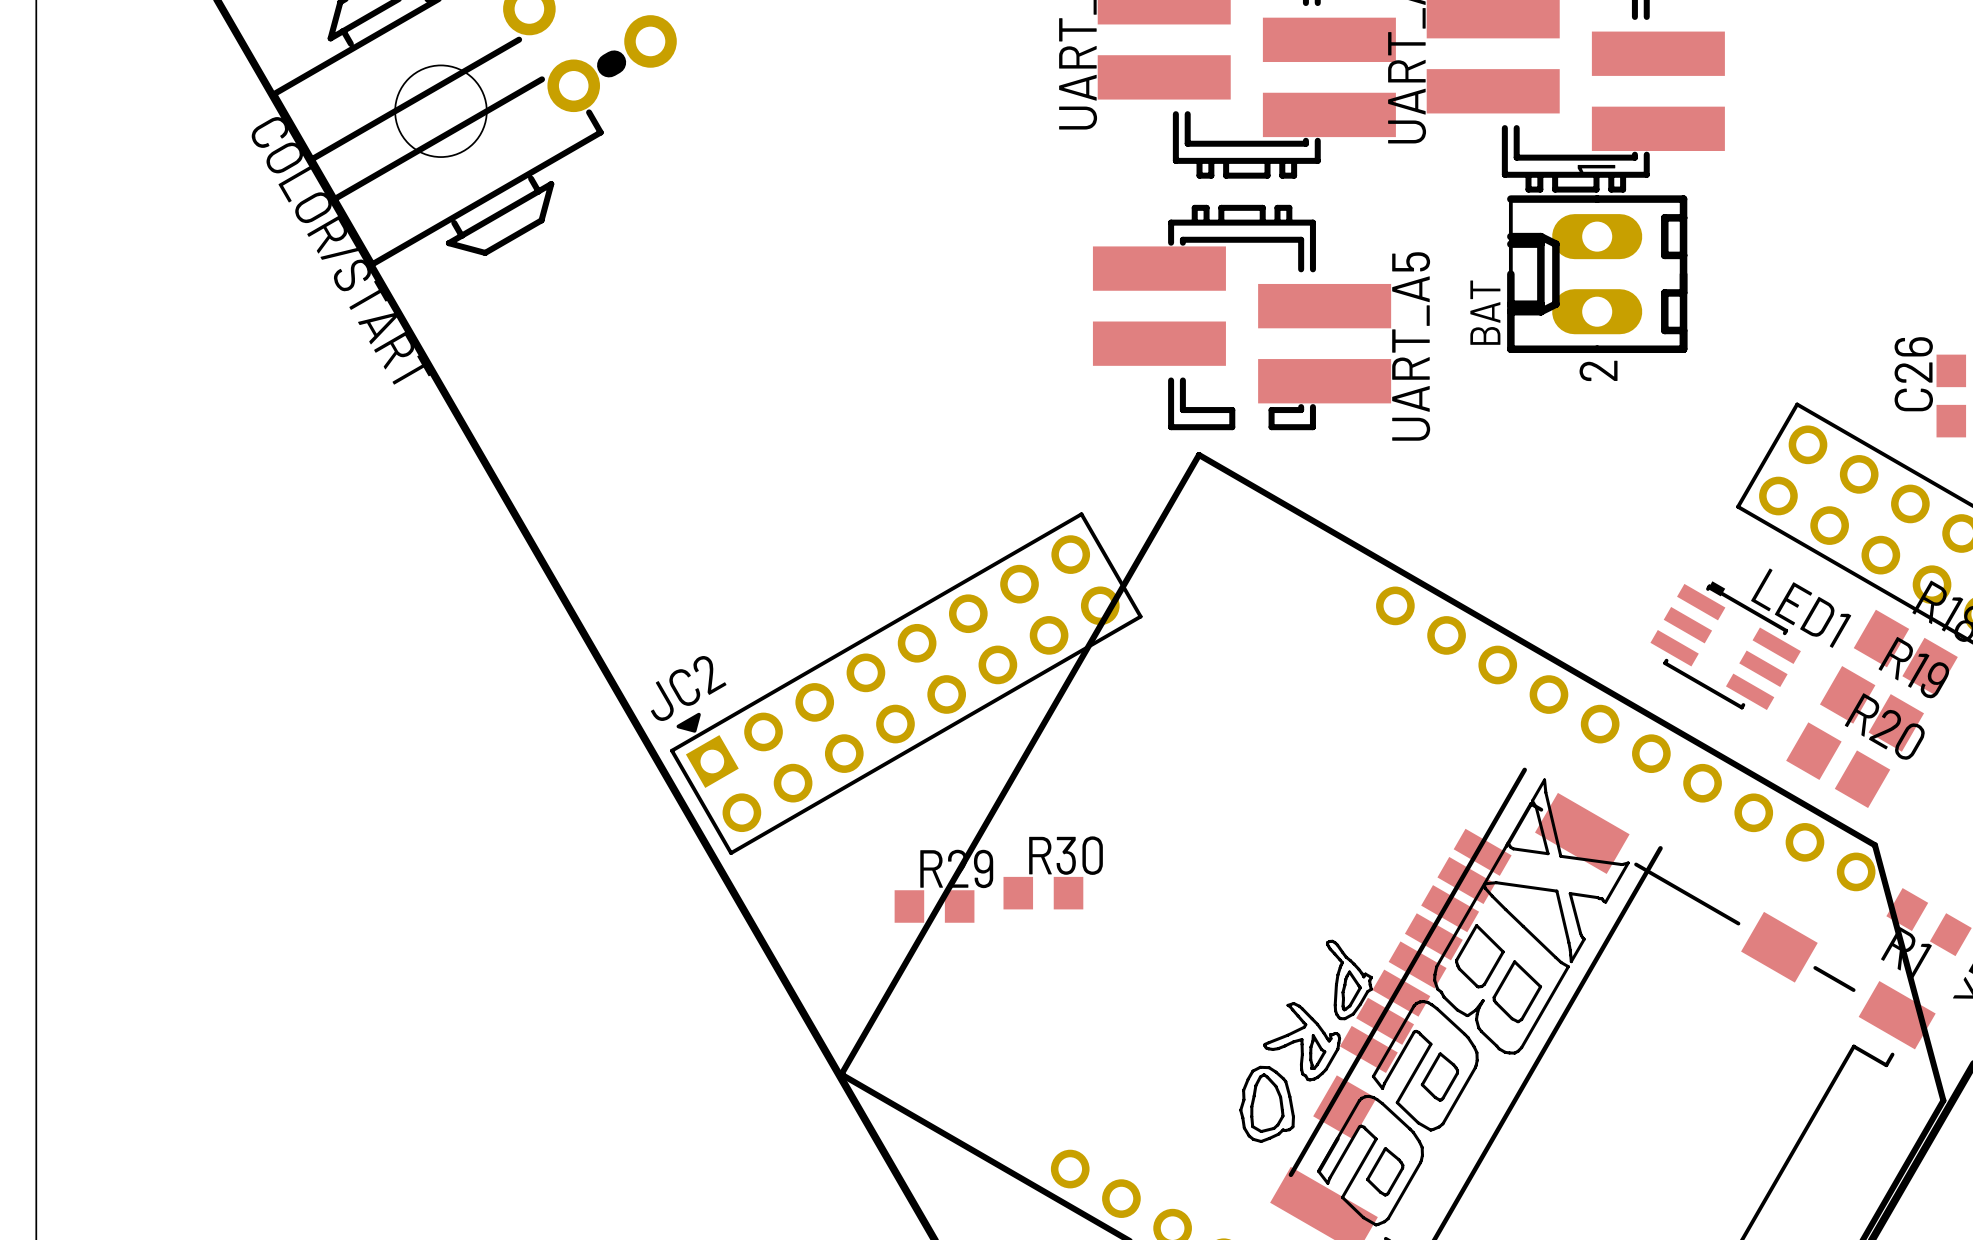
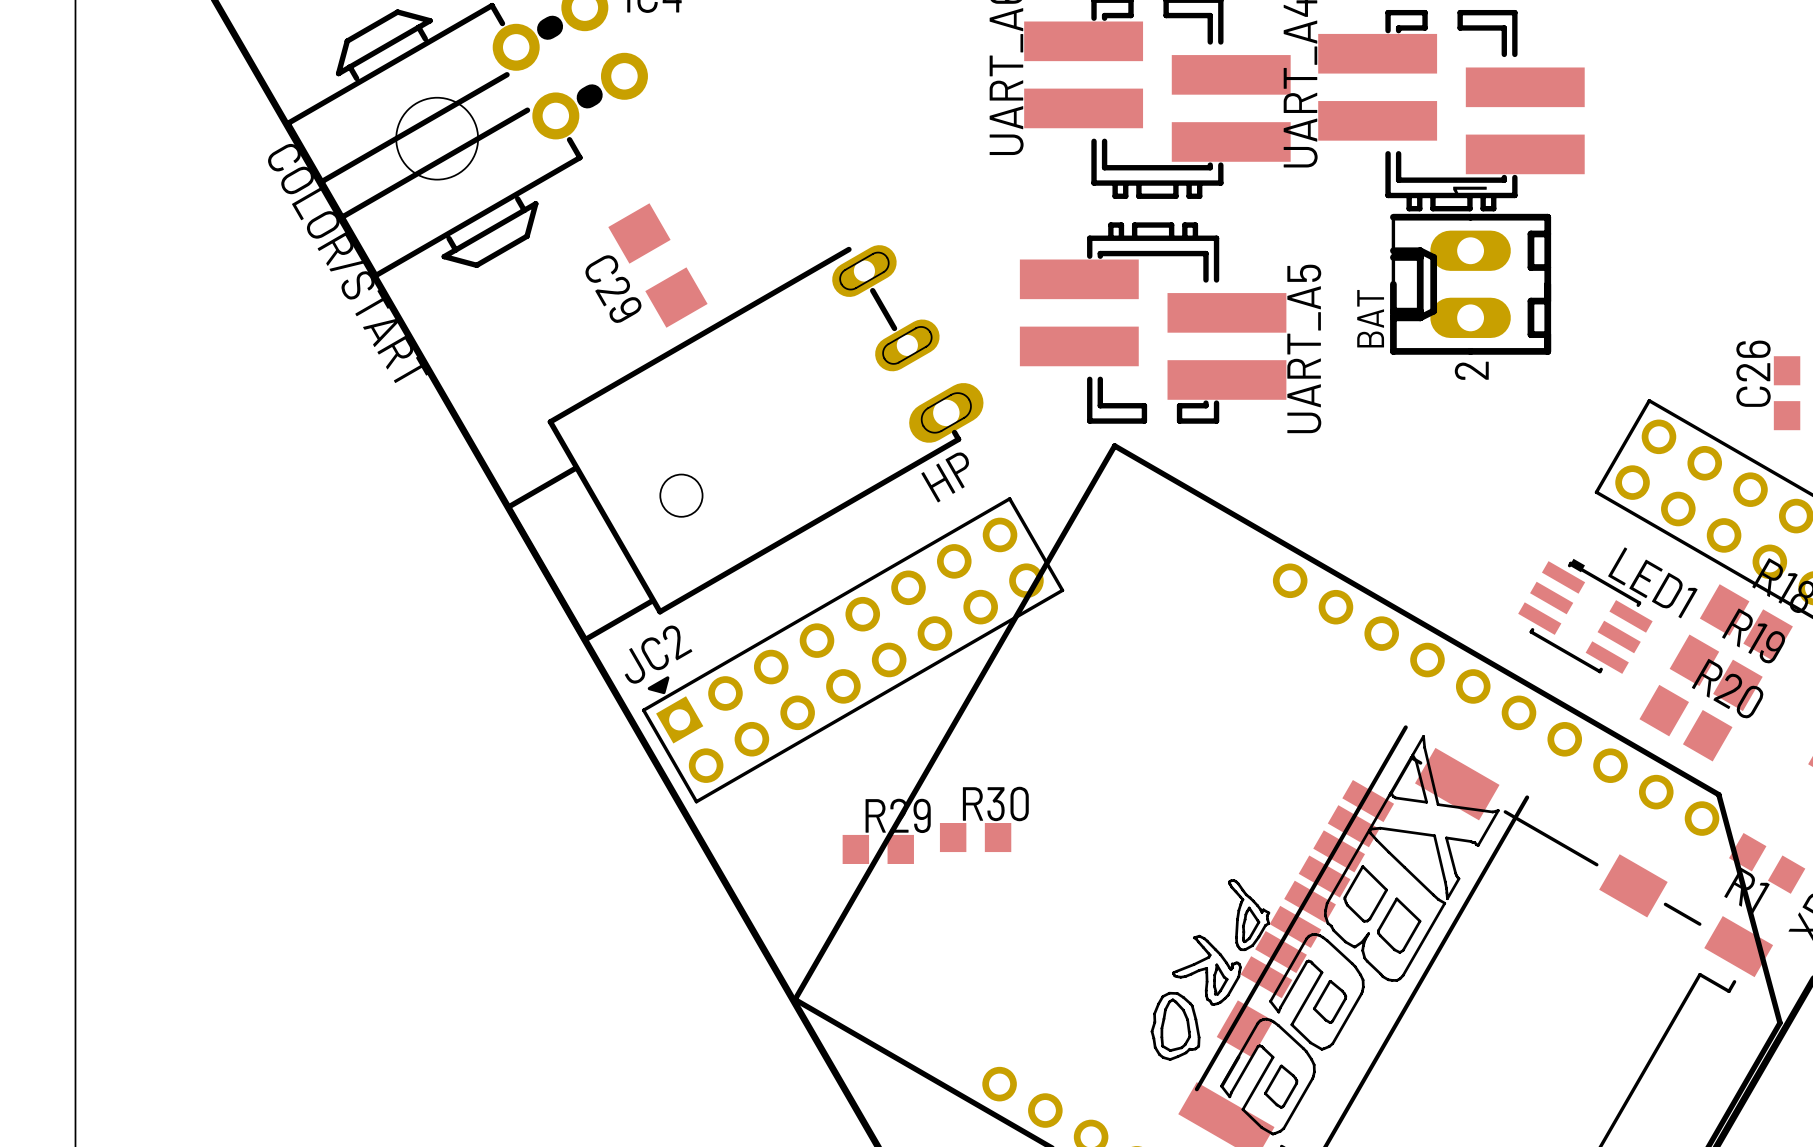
C29: none -> (657, 265)
HP: none -> (744, 443)

